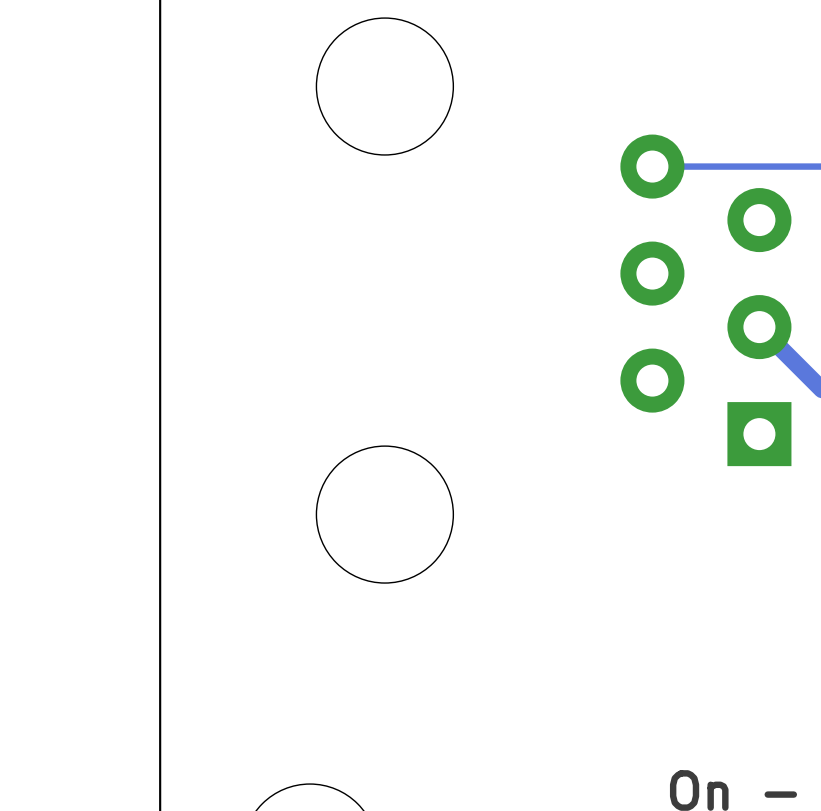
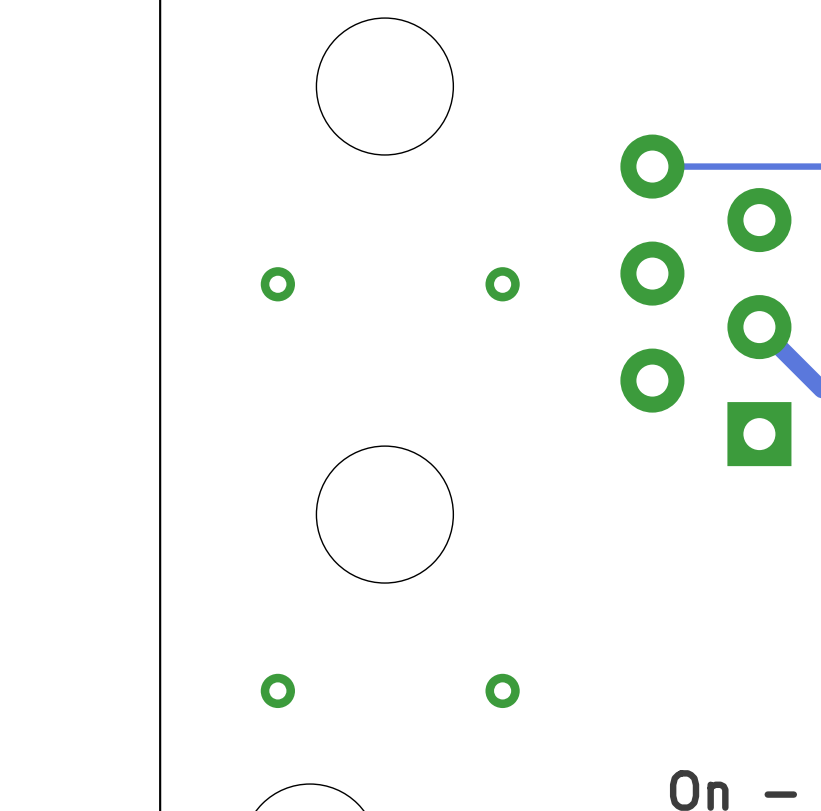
via: none -> (277, 284)
via: none -> (502, 284)
via: none -> (277, 690)
via: none -> (502, 690)

